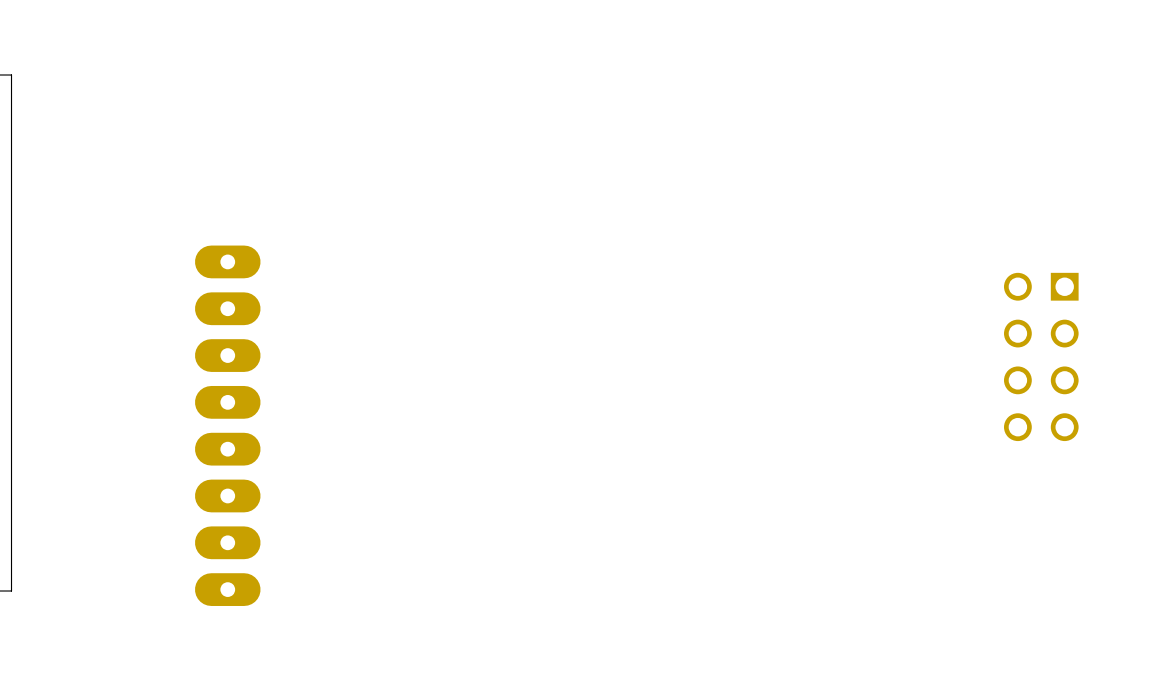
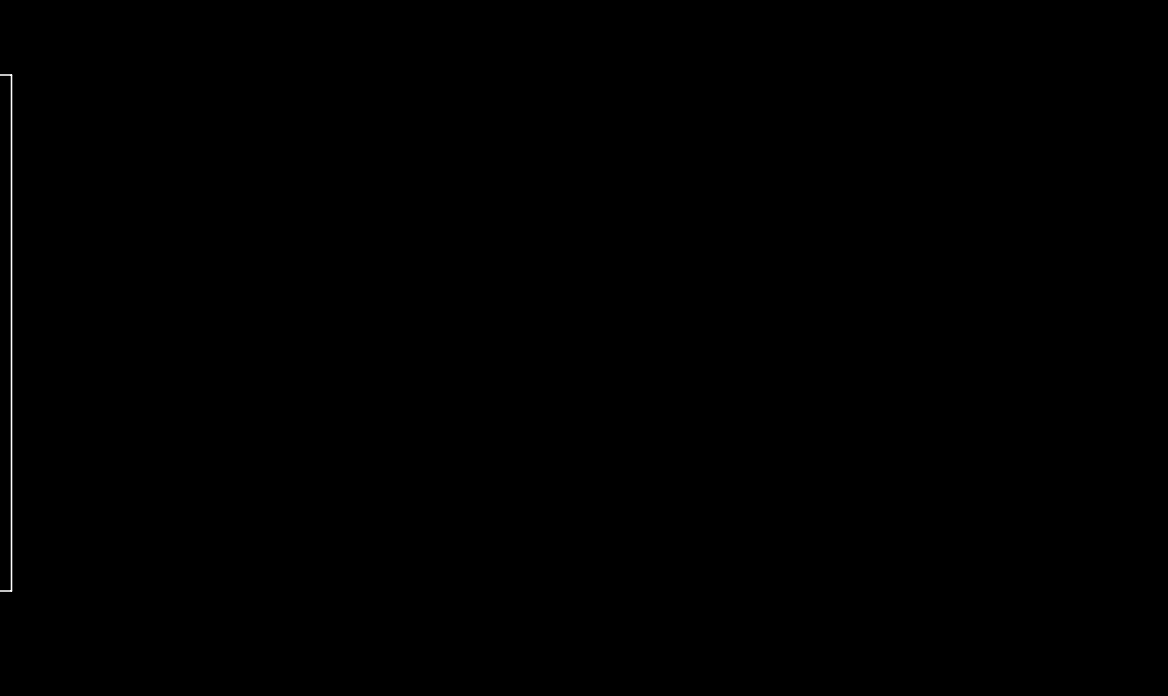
part: (1041, 356) -> none
part: (227, 425) -> none

